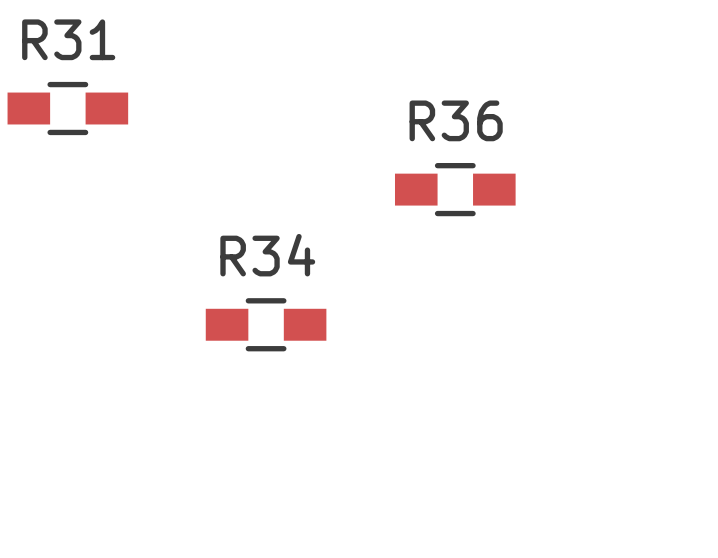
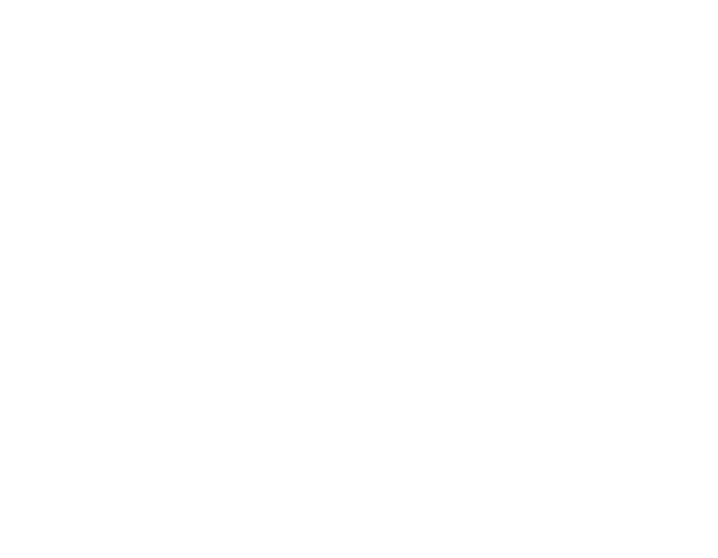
R31: (67, 108) -> none
R36: (455, 189) -> none
R34: (266, 324) -> none

